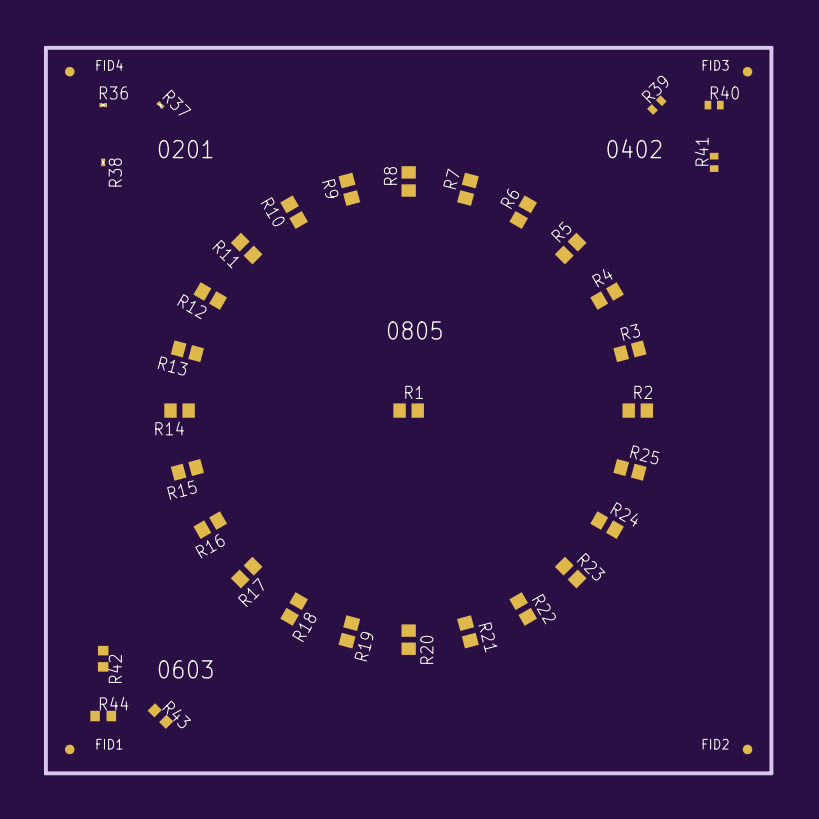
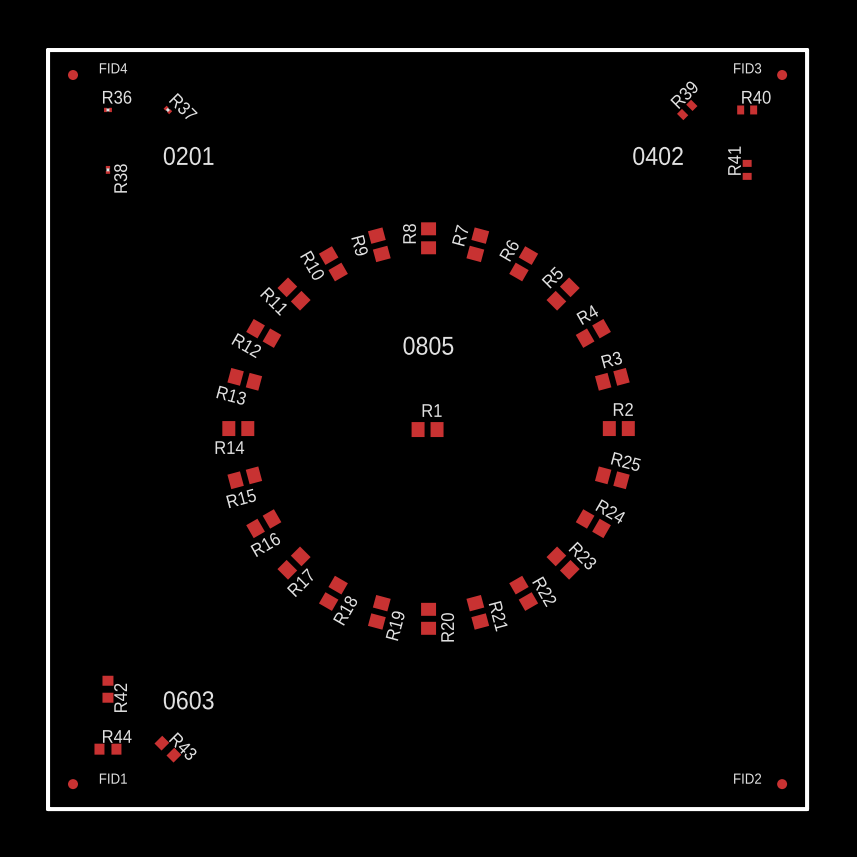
R8 position: (408, 181) -> (428, 238)
R9 position: (349, 189) -> (379, 244)
R7 position: (467, 189) -> (477, 244)
R10 position: (294, 212) -> (333, 263)
R6 position: (523, 212) -> (523, 263)
R11 position: (246, 248) -> (294, 294)
R5 position: (570, 248) -> (563, 294)
R12 position: (210, 296) -> (263, 333)
R4 position: (607, 296) -> (593, 333)
R13 position: (187, 351) -> (244, 379)
R3 position: (629, 351) -> (612, 379)
R14 position: (179, 410) -> (238, 428)
R2 position: (637, 410) -> (618, 428)
R15 position: (187, 469) -> (244, 477)
R25 position: (629, 469) -> (612, 477)
R16 position: (210, 525) -> (263, 523)
R24 position: (607, 525) -> (593, 523)
R17 position: (246, 572) -> (294, 563)
R23 position: (570, 572) -> (563, 563)
R18 position: (294, 608) -> (333, 593)
R22 position: (523, 608) -> (523, 593)
R19 position: (349, 631) -> (379, 612)
R21 position: (467, 631) -> (477, 612)
R20 position: (408, 639) -> (428, 618)

